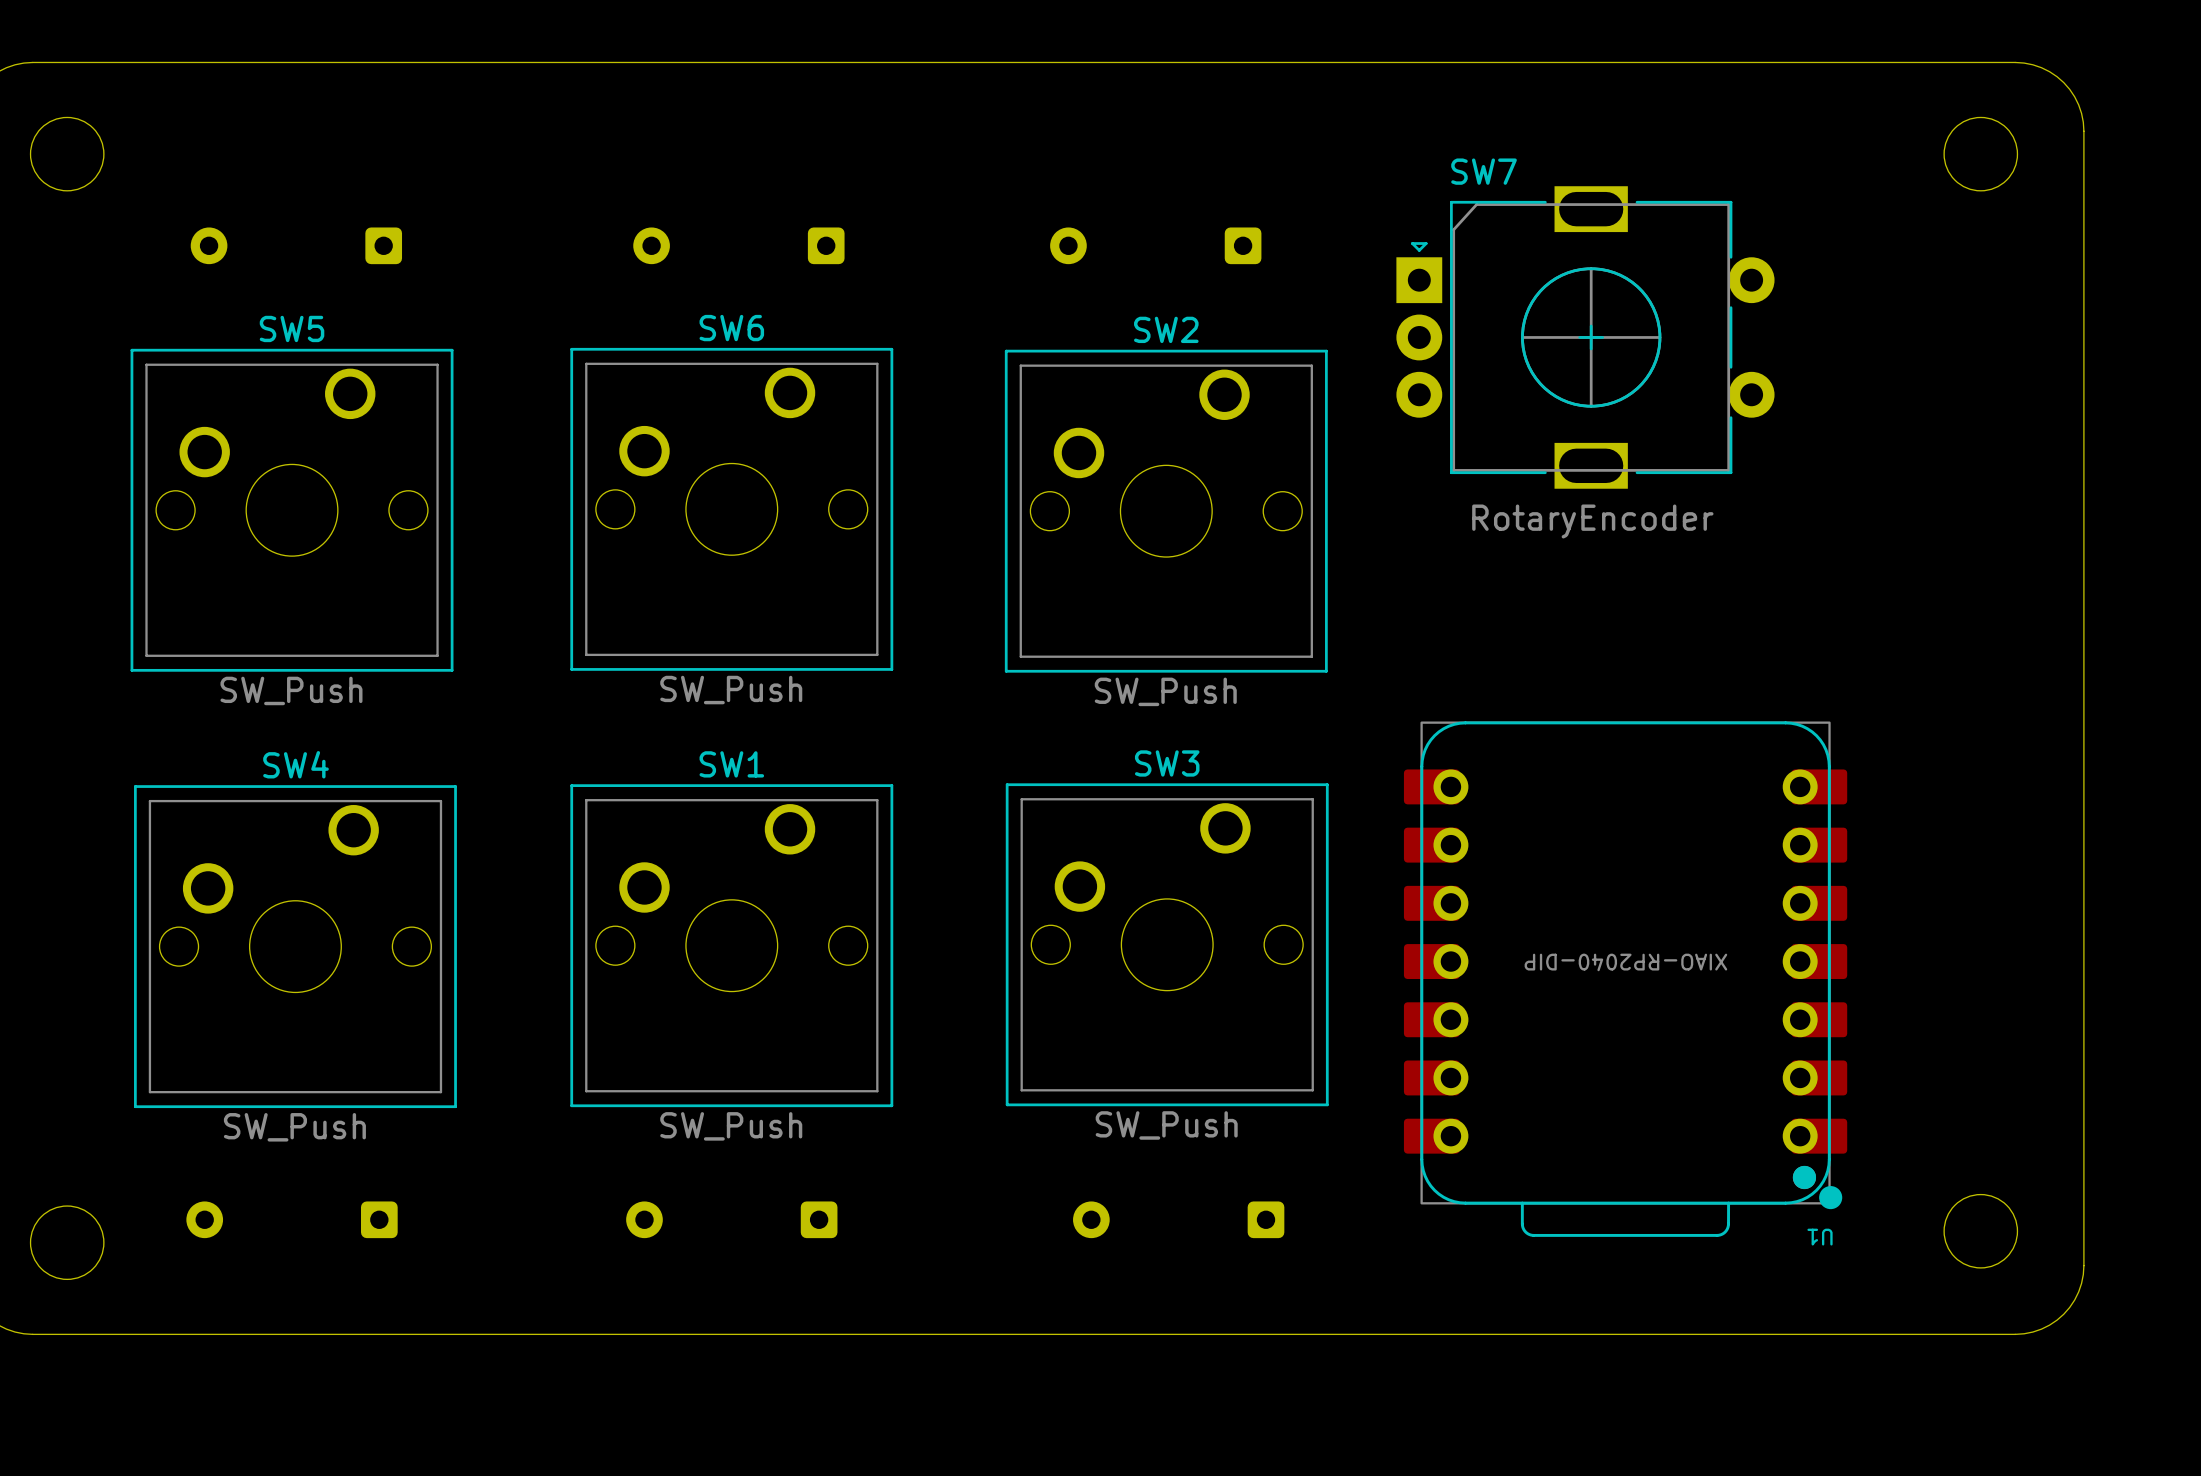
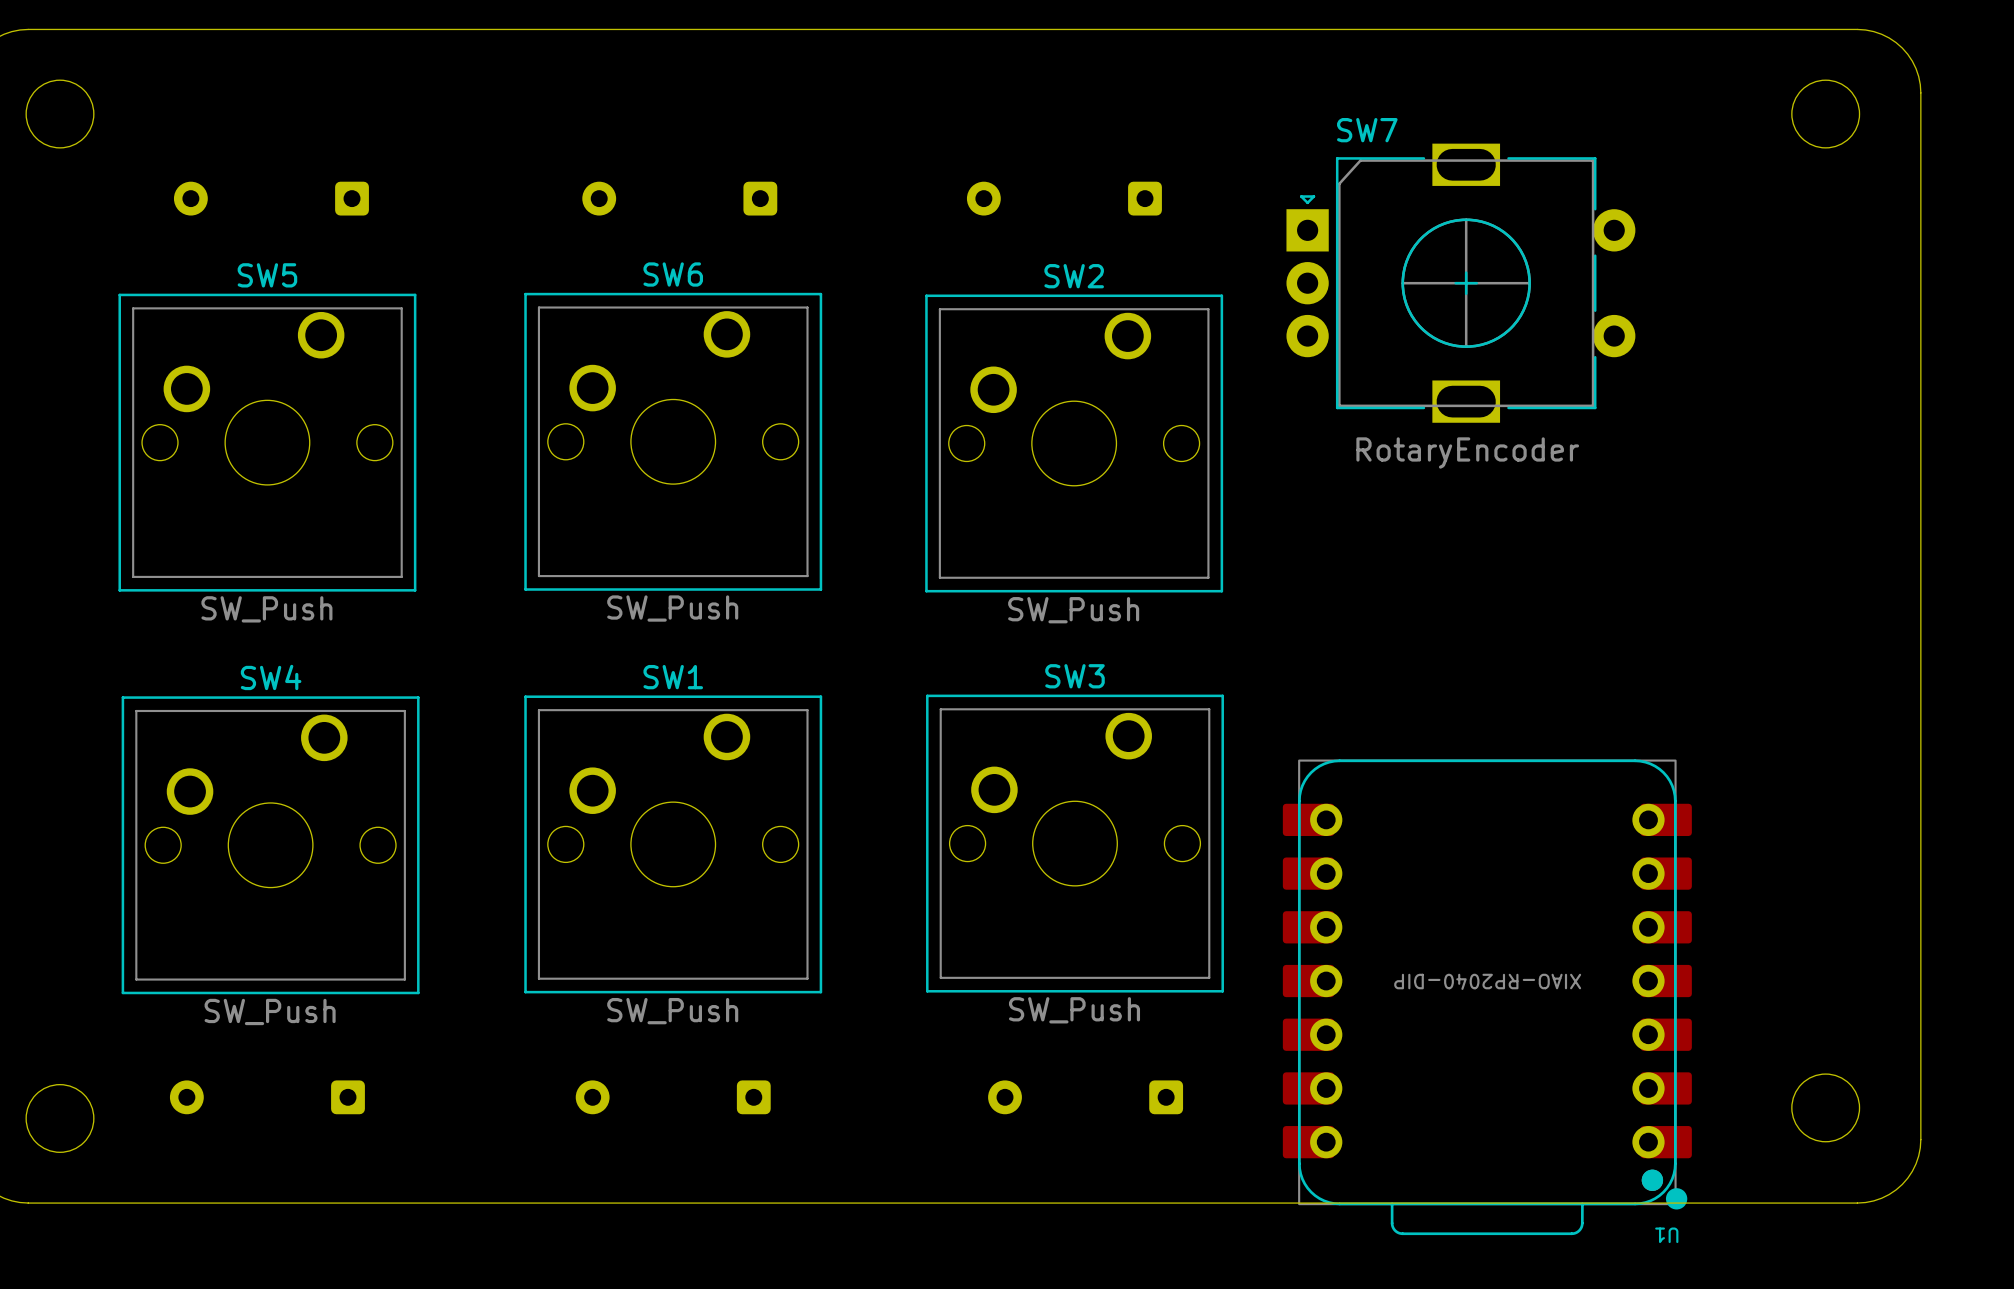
U1 position: (1625, 979) -> (1487, 997)

